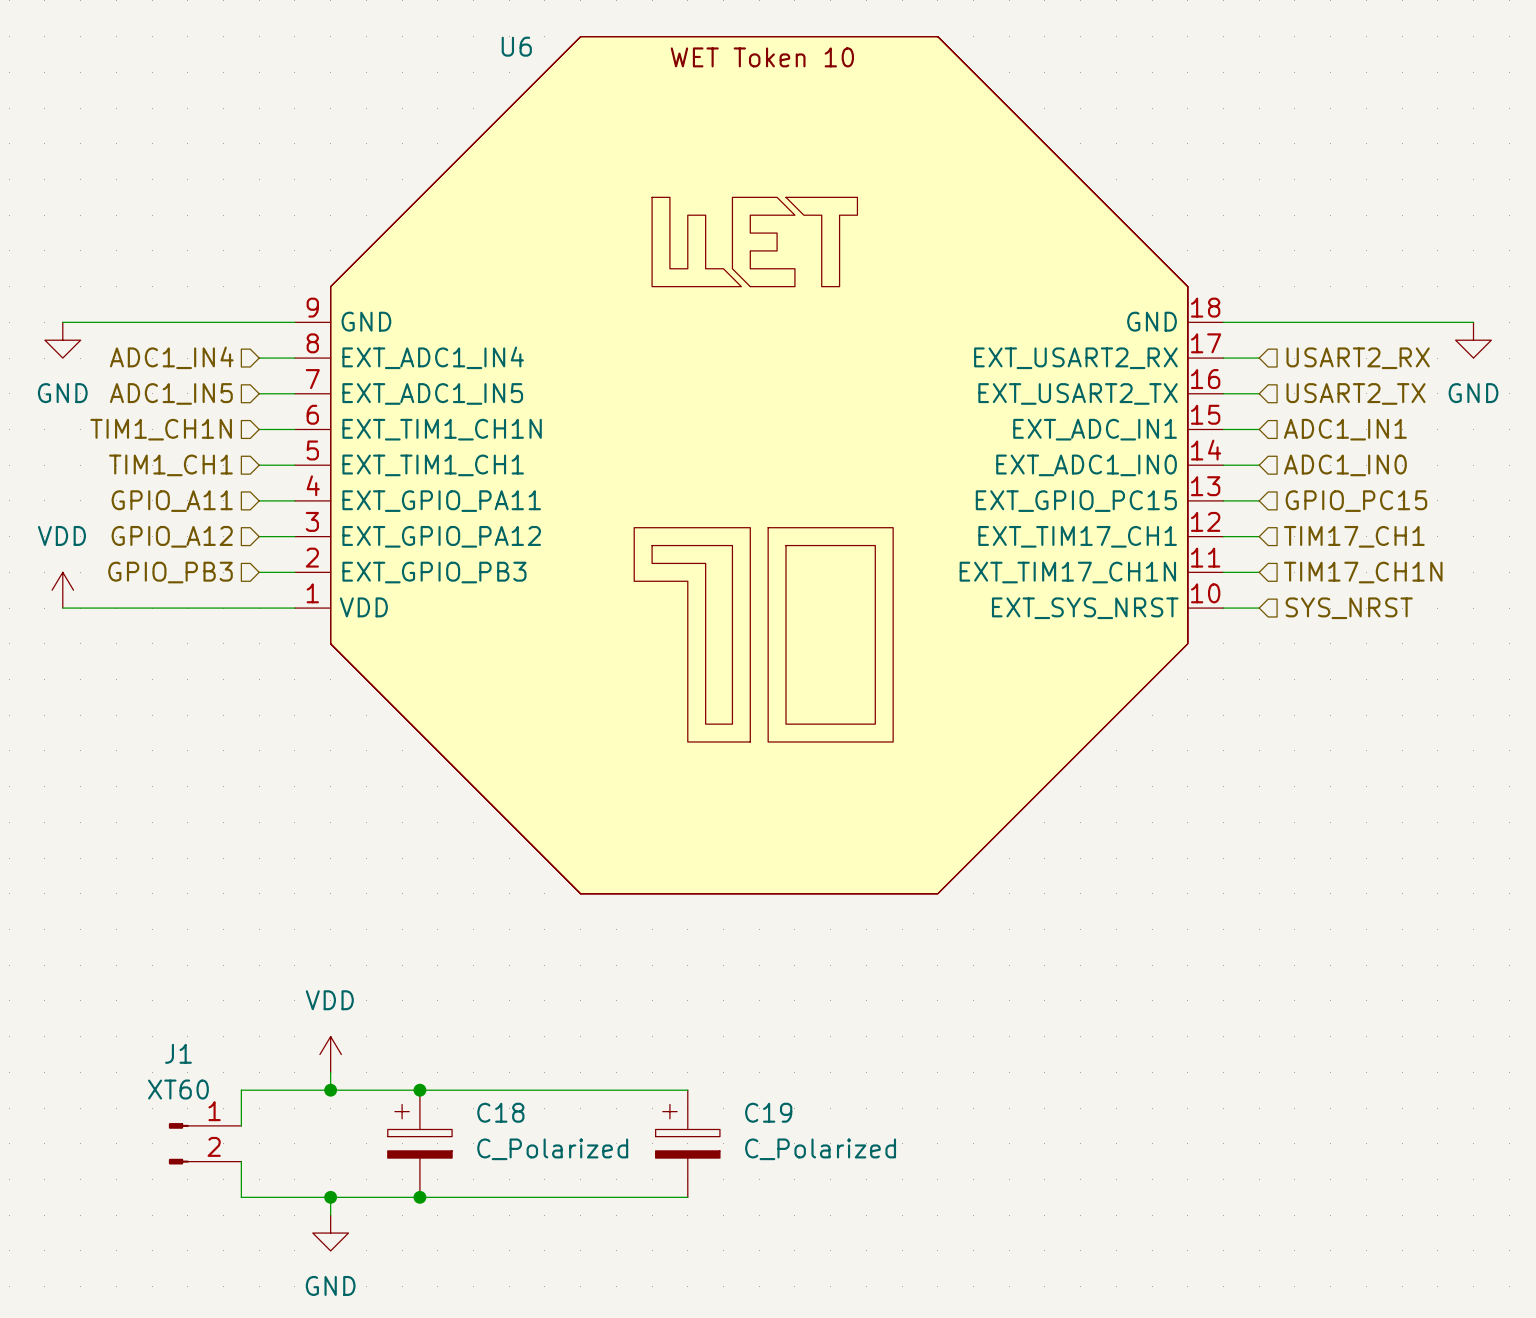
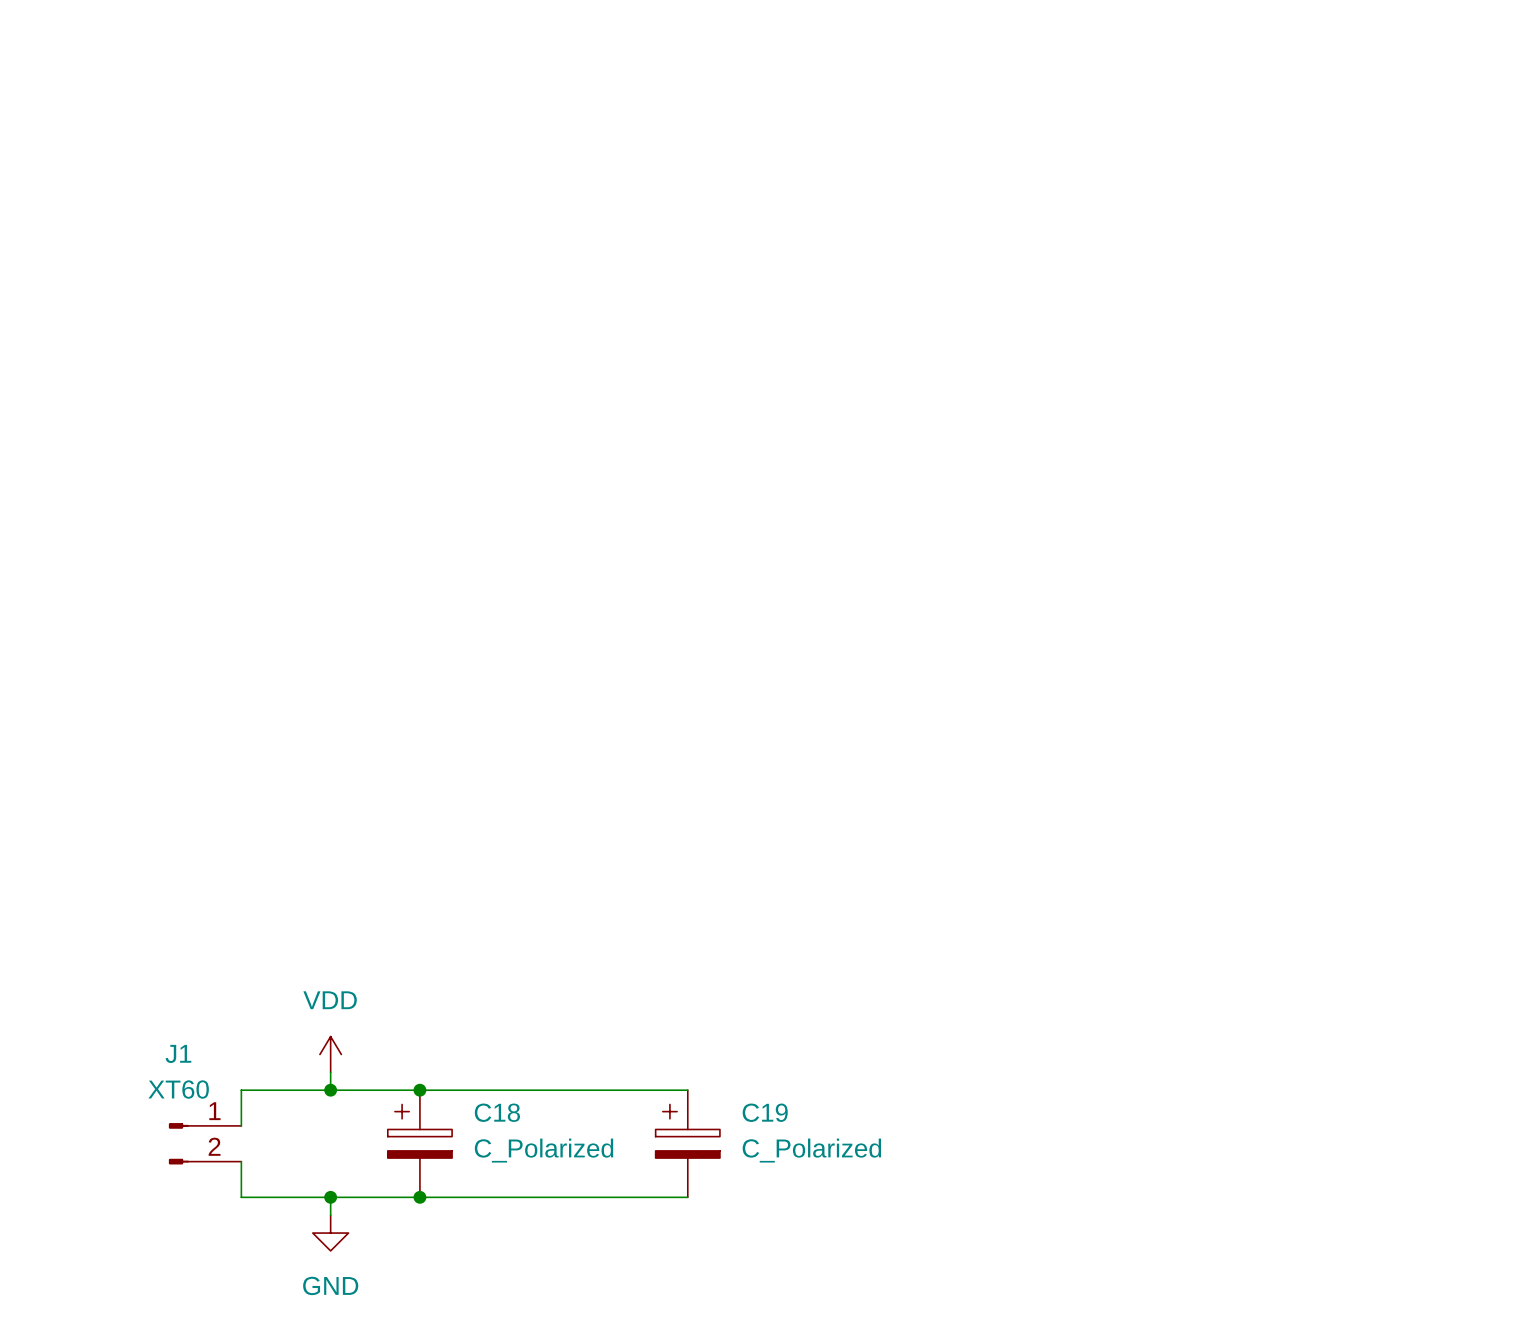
wire: (62, 322) (294, 322) -> none
wire: (1223, 322) (1473, 322) -> none
power symbol: GND (62, 340) -> none
power symbol: GND (1473, 340) -> none
hierarchical label: ADC1_IN4 (171, 357) -> none
wire: (259, 358) (294, 358) -> none
wire: (1223, 358) (1259, 358) -> none
hierarchical label: USART2_RX (1358, 358) -> none
hierarchical label: ADC1_IN5 (171, 393) -> none
wire: (259, 393) (294, 393) -> none
wire: (1223, 393) (1259, 393) -> none
hierarchical label: USART2_TX (1356, 393) -> none
hierarchical label: TIM1_CH1N (161, 429) -> none
wire: (259, 429) (294, 429) -> none
wire: (1223, 429) (1259, 429) -> none
hierarchical label: ADC1_IN1 (1345, 429) -> none
hierarchical label: TIM1_CH1 (170, 465) -> none
wire: (259, 465) (294, 465) -> none
U6: (759, 465) -> none
wire: (1223, 465) (1259, 465) -> none
hierarchical label: ADC1_IN0 (1345, 465) -> none
wire: (259, 500) (294, 500) -> none
wire: (1223, 500) (1259, 500) -> none
hierarchical label: GPIO_A11 (172, 501) -> none
hierarchical label: GPIO_PC15 (1356, 501) -> none
hierarchical label: GPIO_A12 (172, 536) -> none
wire: (259, 536) (294, 536) -> none
wire: (1223, 536) (1259, 536) -> none
hierarchical label: TIM17_CH1 (1354, 536) -> none
hierarchical label: GPIO_PB3 (170, 572) -> none
wire: (259, 572) (294, 572) -> none
wire: (1223, 572) (1259, 572) -> none
hierarchical label: TIM17_CH1N (1363, 572) -> none
power symbol: VDD (62, 590) -> none
wire: (62, 608) (294, 608) -> none
wire: (1223, 608) (1259, 608) -> none
hierarchical label: SYS_NRST (1349, 608) -> none

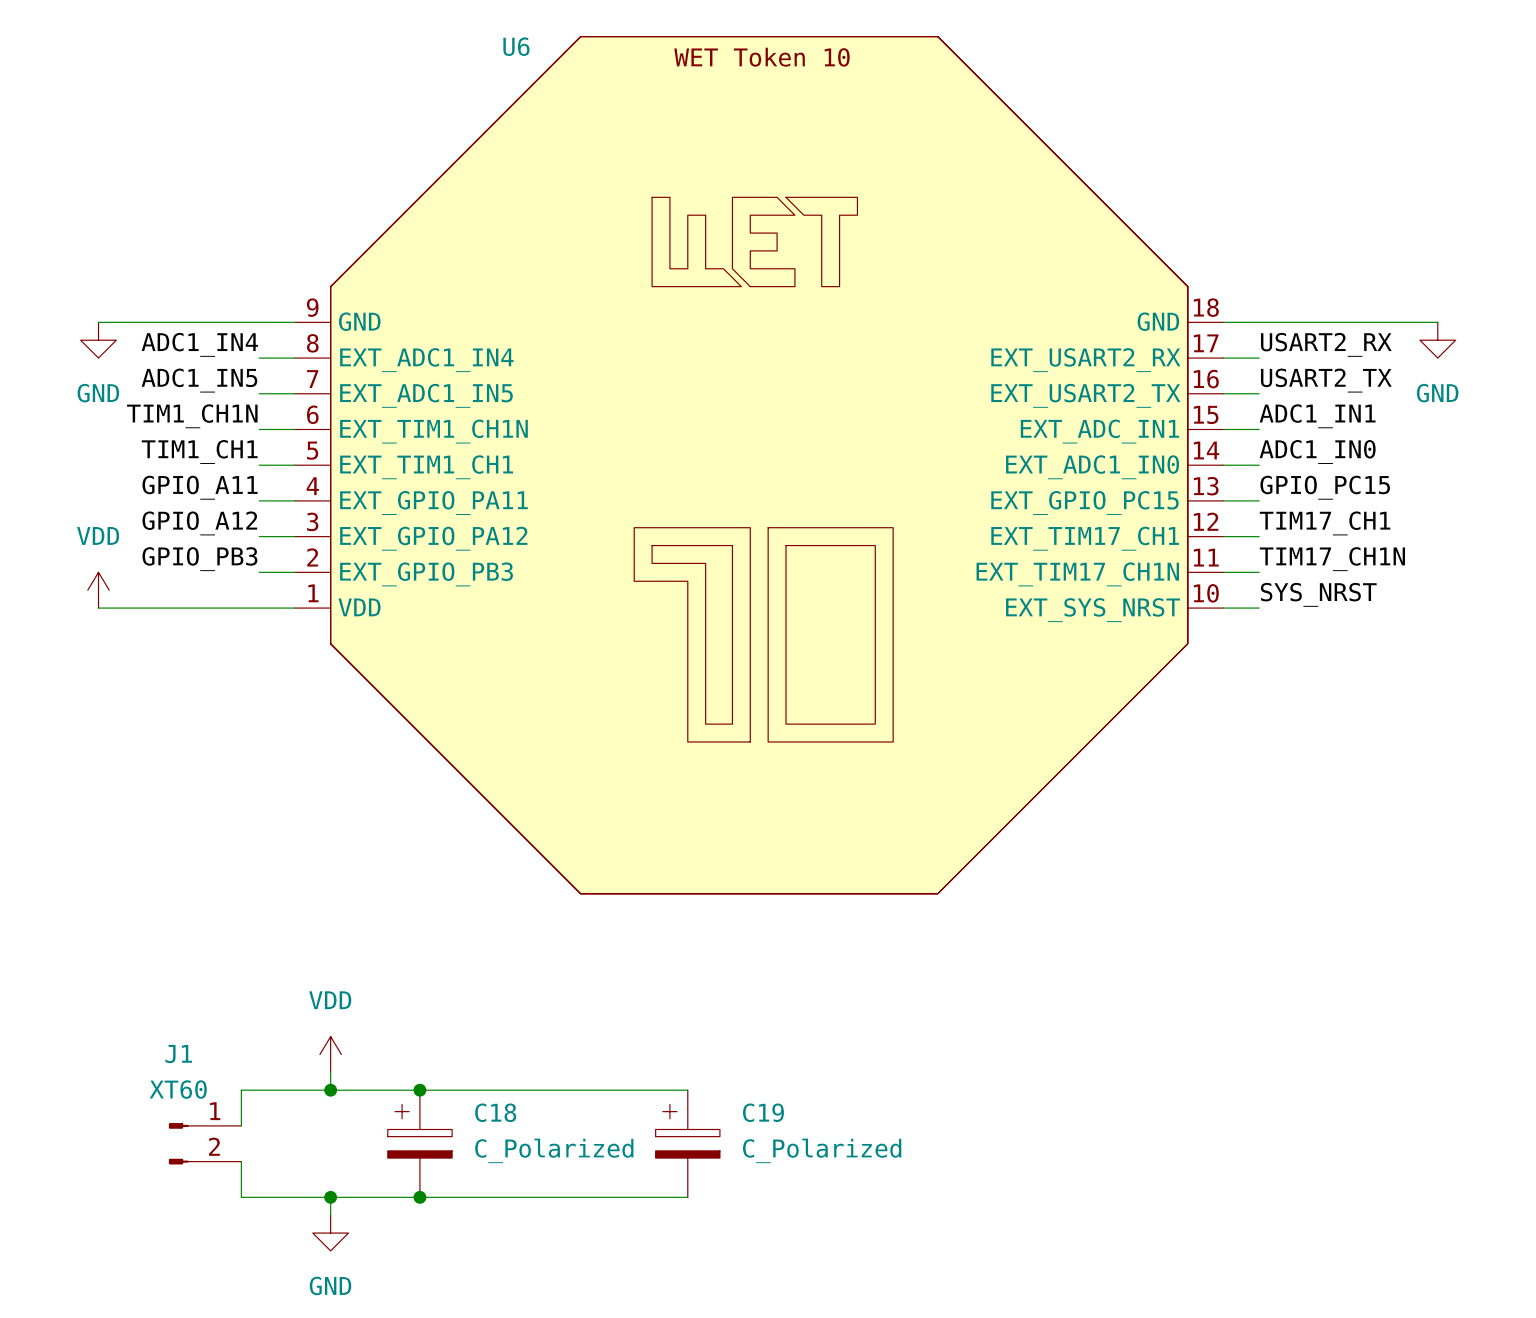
wire: none -> (98, 322) (294, 322)
wire: none -> (1223, 322) (1437, 322)
power symbol: none -> GND (98, 340)
power symbol: none -> GND (1437, 340)
label: none -> ADC1_IN4 (199, 344)
label: none -> USART2_RX (1326, 344)
wire: none -> (259, 358) (294, 358)
wire: none -> (1223, 358) (1259, 358)
label: none -> ADC1_IN5 (199, 380)
label: none -> USART2_TX (1326, 380)
wire: none -> (259, 393) (294, 393)
wire: none -> (1223, 393) (1259, 393)
label: none -> TIM1_CH1N (192, 416)
label: none -> ADC1_IN1 (1317, 416)
wire: none -> (259, 429) (294, 429)
wire: none -> (1223, 429) (1259, 429)
label: none -> TIM1_CH1 (199, 451)
label: none -> ADC1_IN0 (1317, 451)
wire: none -> (259, 465) (294, 465)
U6: none -> (759, 465)
wire: none -> (1223, 465) (1259, 465)
label: none -> GPIO_A11 (200, 487)
label: none -> GPIO_PC15 (1325, 487)
wire: none -> (259, 500) (294, 500)
wire: none -> (1223, 500) (1259, 500)
label: none -> GPIO_A12 (199, 523)
label: none -> TIM17_CH1 (1325, 523)
wire: none -> (259, 536) (294, 536)
wire: none -> (1223, 536) (1259, 536)
label: none -> GPIO_PB3 (199, 559)
label: none -> TIM17_CH1N (1332, 559)
wire: none -> (259, 572) (294, 572)
wire: none -> (1223, 572) (1259, 572)
power symbol: none -> VDD (98, 590)
label: none -> SYS_NRST (1318, 594)
wire: none -> (98, 608) (294, 608)
wire: none -> (1223, 608) (1259, 608)

